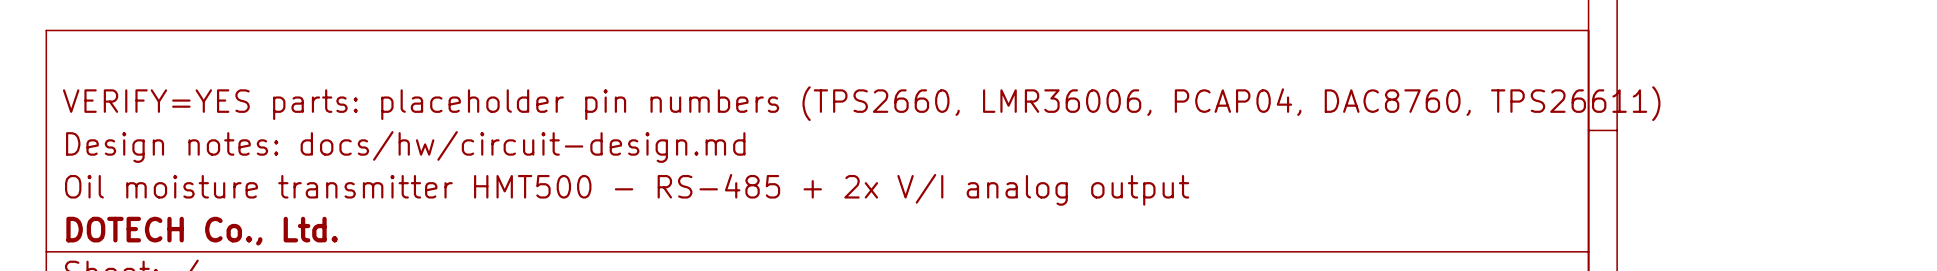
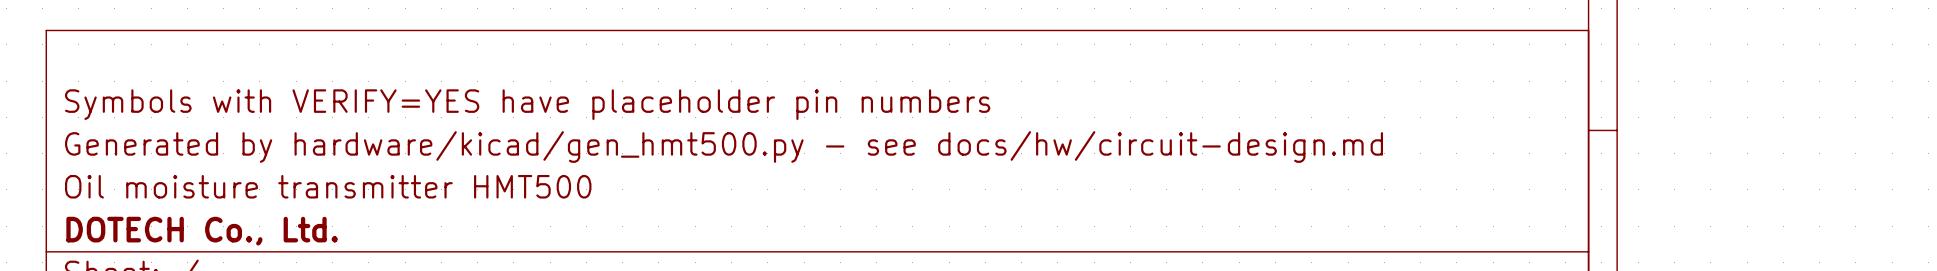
title block: VERIFY=YES parts: placeholder pin numbers (TPS2660, LMR36006, PCAP04, DAC8760, TPS26611) (861, 103) -> Symbols with VERIFY=YES have placeholder pin numbers (527, 104)
title block: Design notes: docs/hw/circuit-design.md (405, 146) -> Generated by hardware/kicad/gen_hmt500.py - see docs/hw/circuit-design.md (724, 146)
title block: Oil moisture transmitter HMT500 - RS-485 + 2x V/I analog output (627, 189) -> Oil moisture transmitter HMT500 (328, 186)

